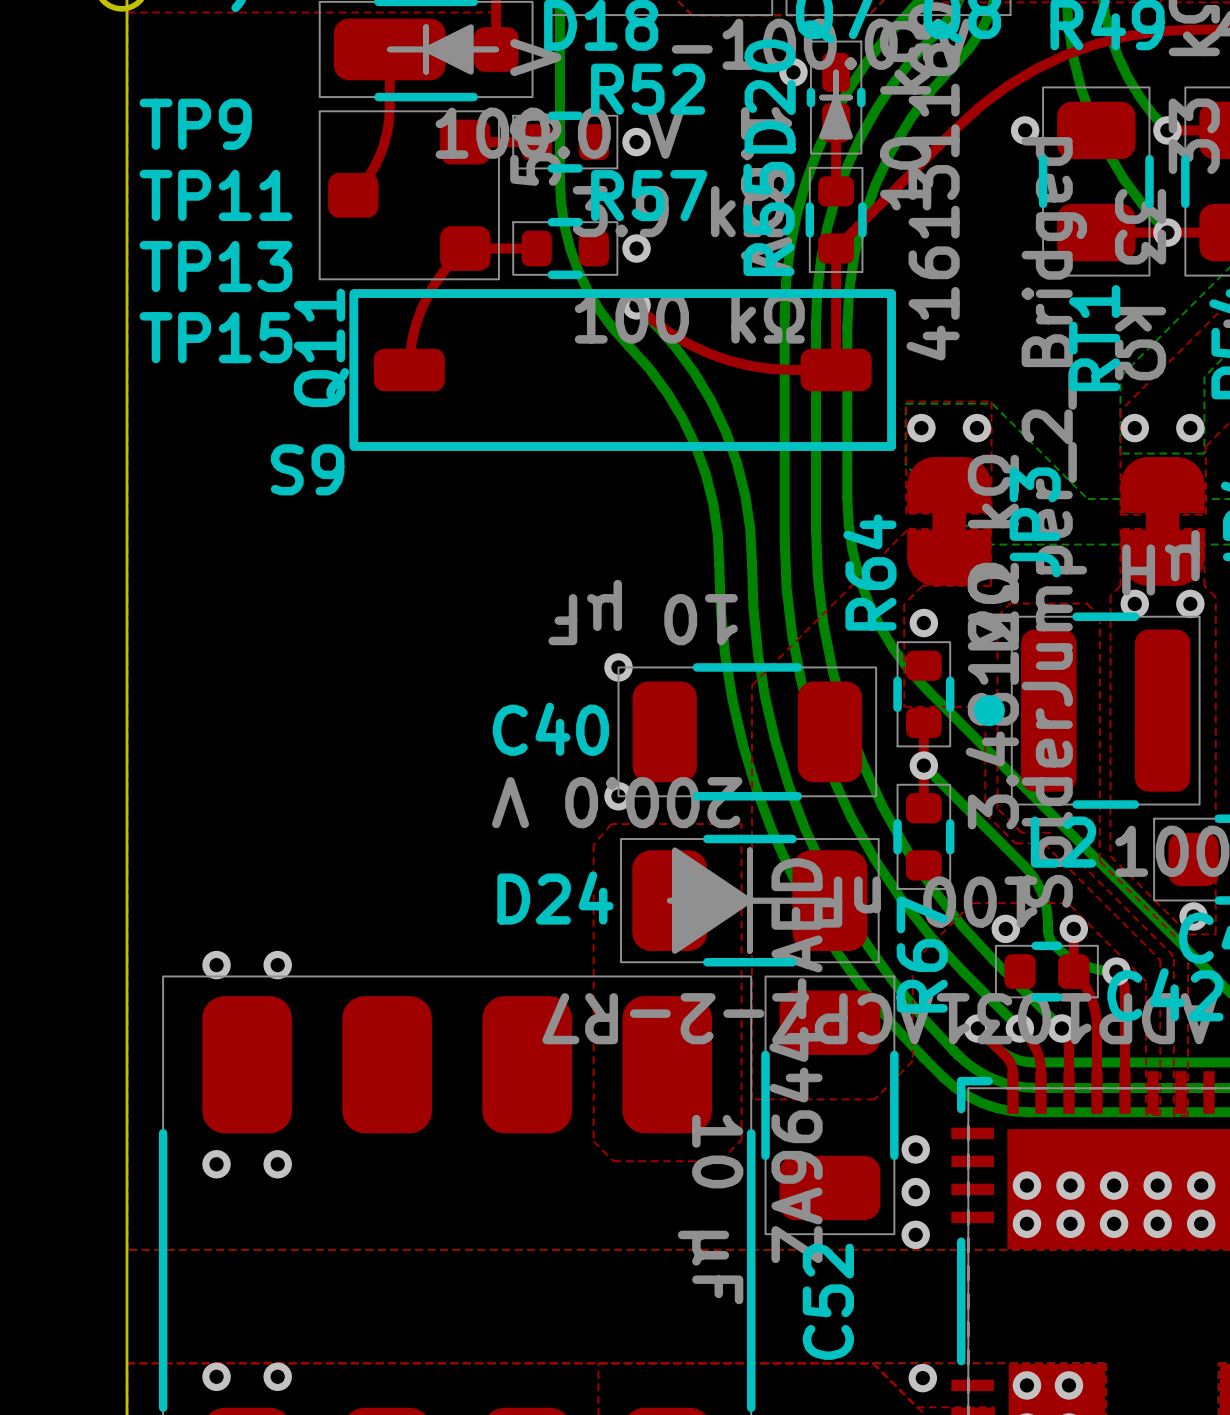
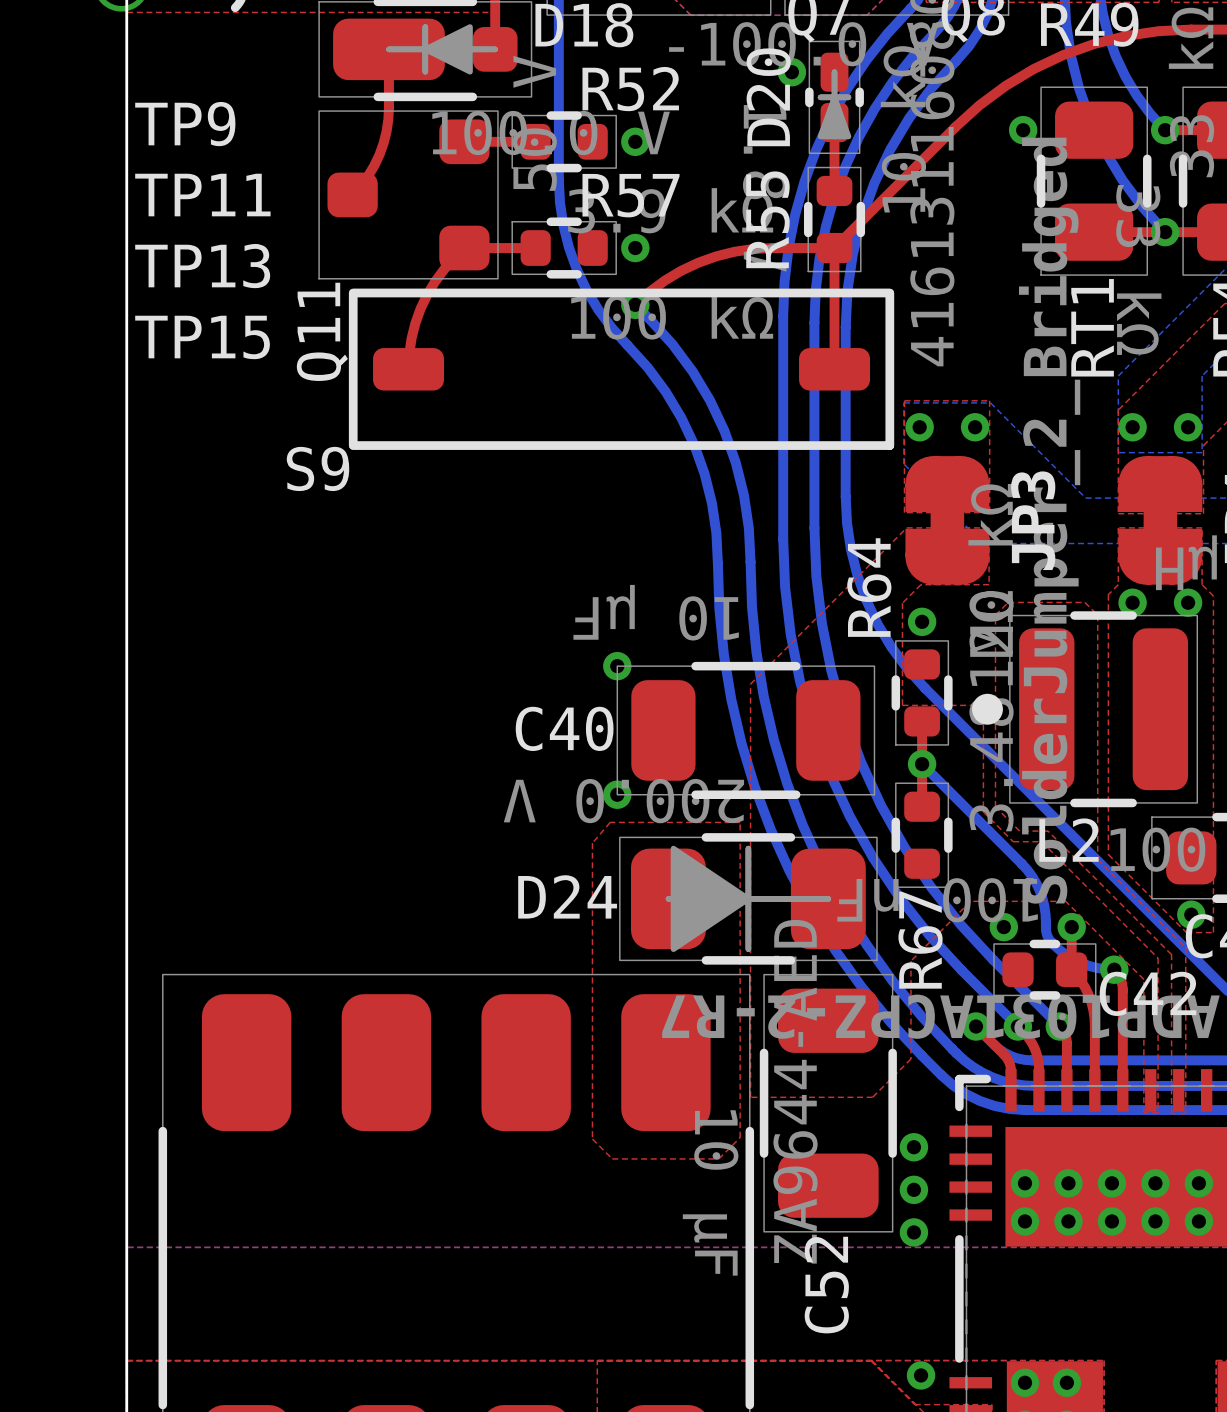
top track: (636, 305) (669, 332) (708, 353) (728, 360) (770, 368) (836, 370) -> (635, 304) (664, 280) (681, 270) (716, 256) (753, 248) (816, 248)
via: (216, 965) -> none
via: (277, 965) -> none
via: (216, 1164) -> none
via: (277, 1164) -> none
via: (216, 1376) -> none
via: (277, 1376) -> none

